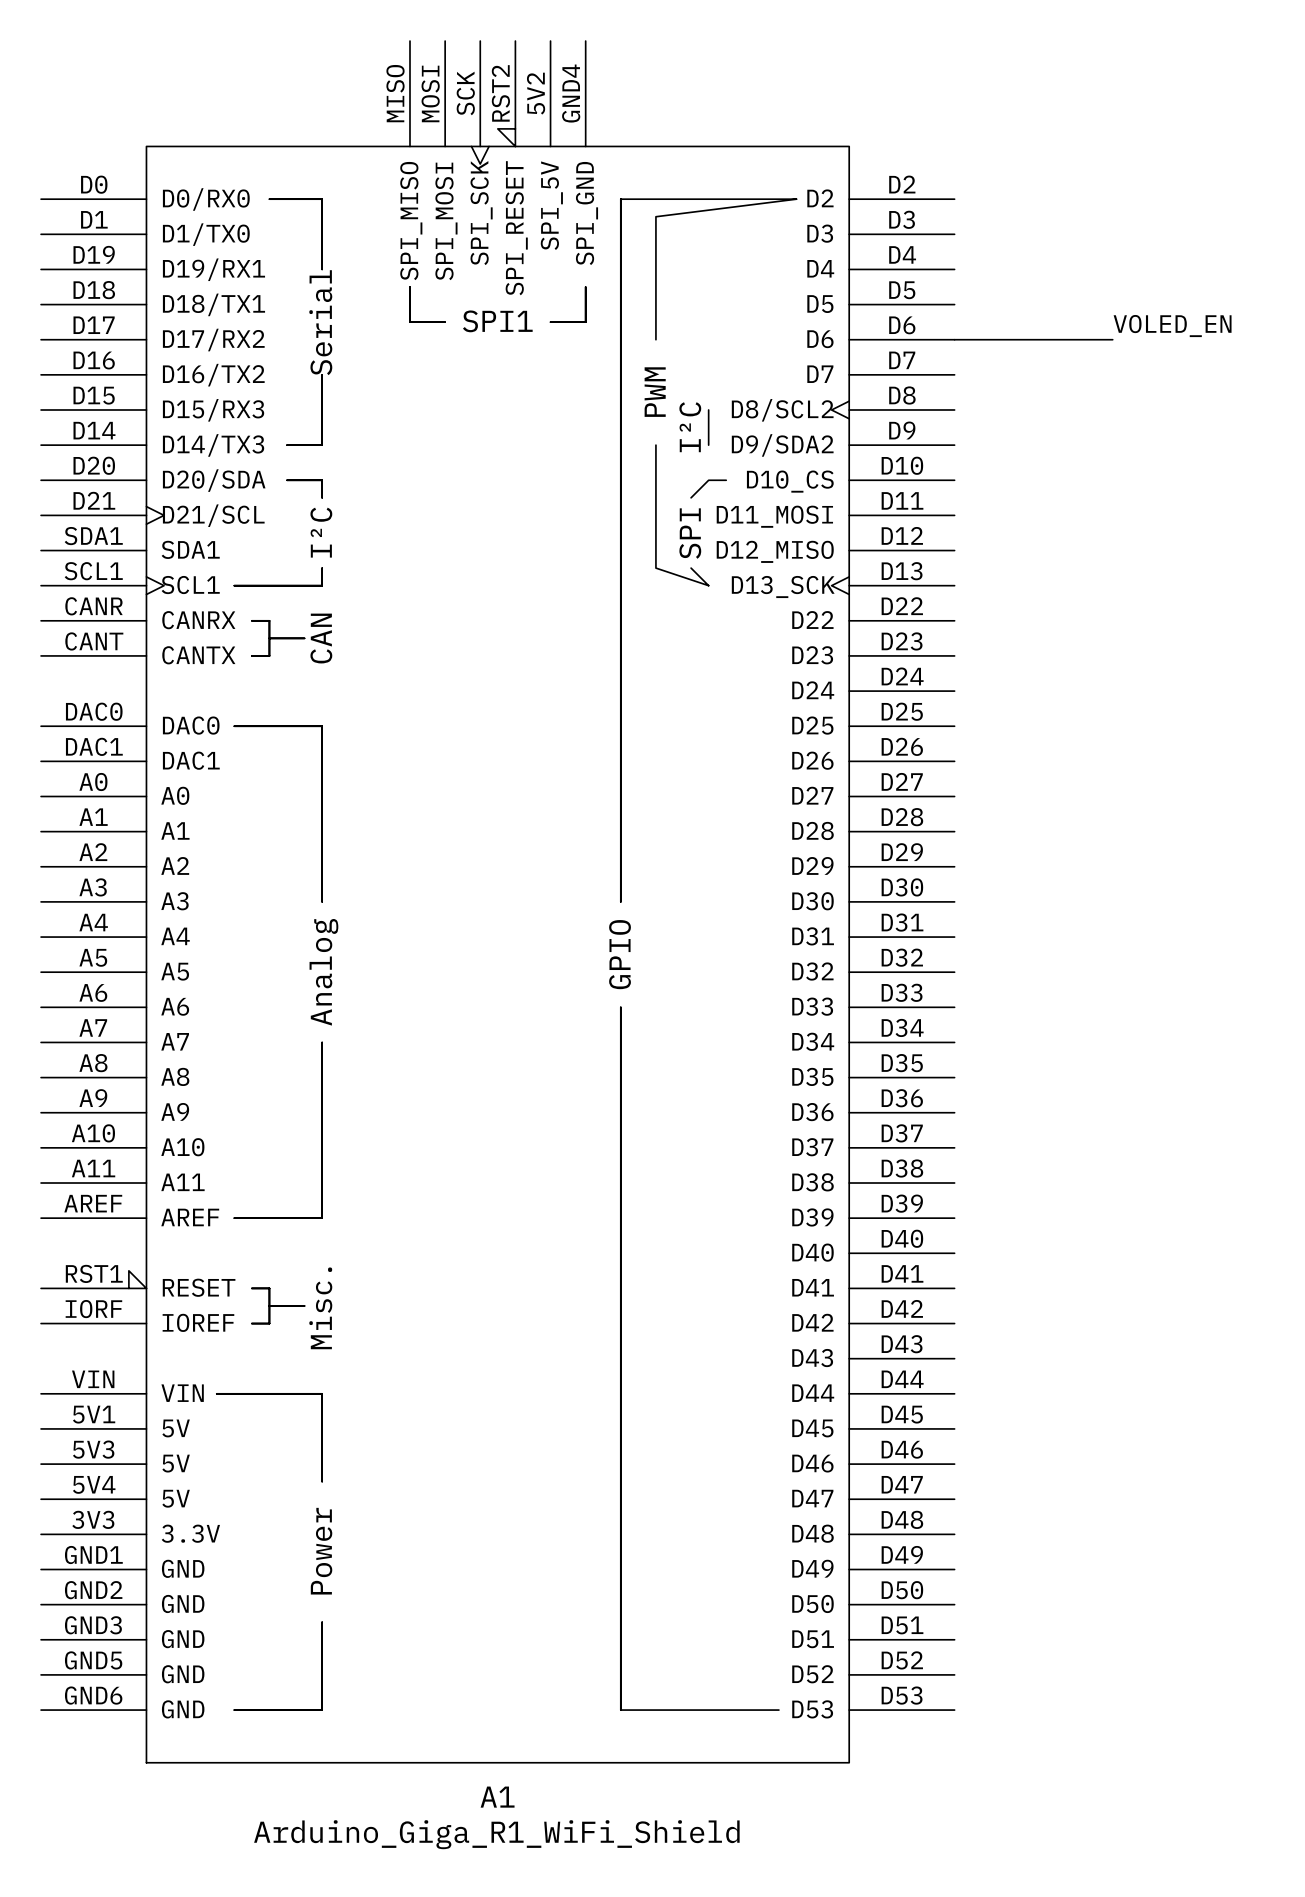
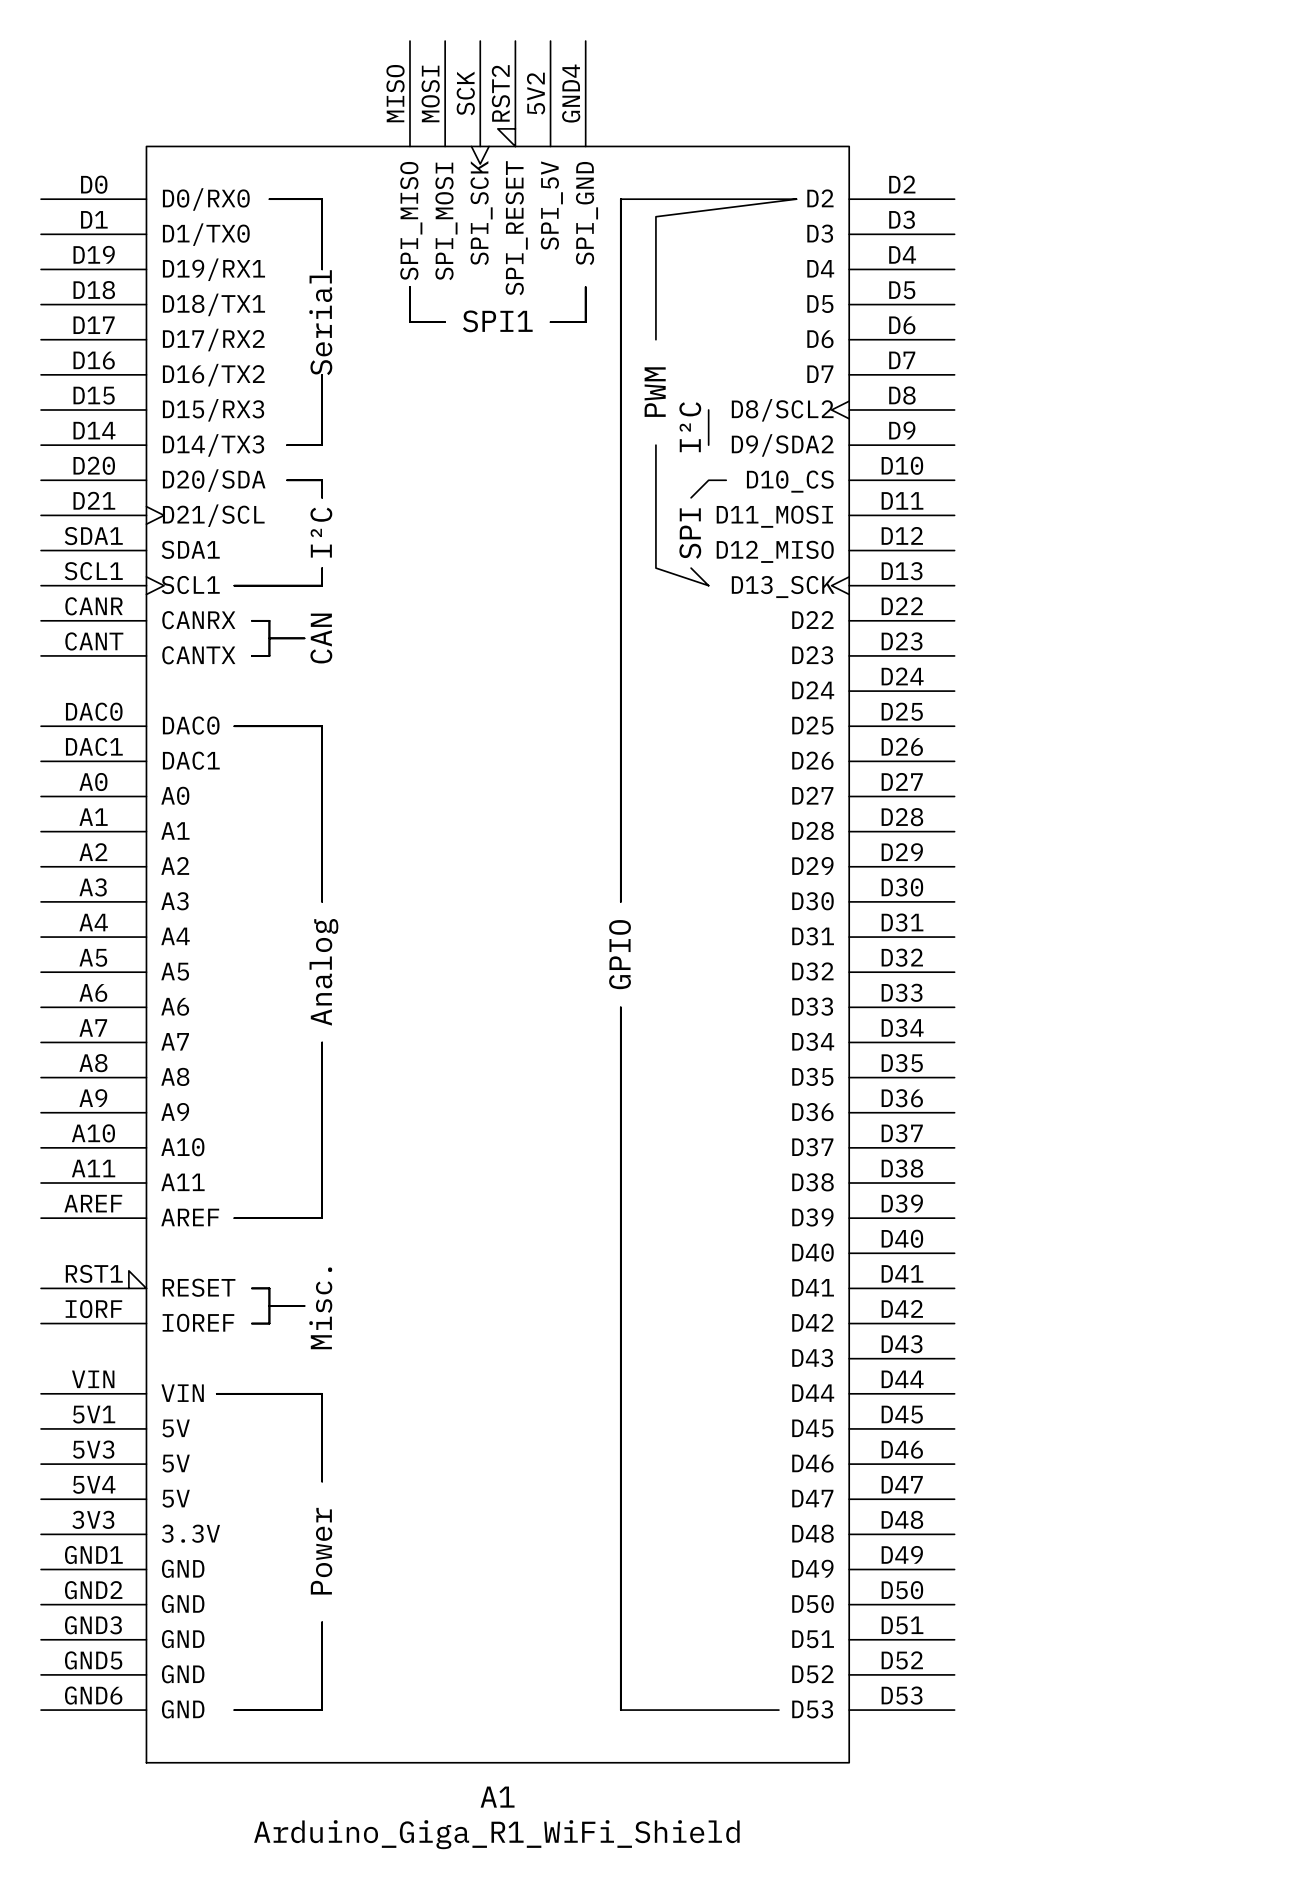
label: VOLED_EN (1172, 326) -> none
wire: (954, 339) (1112, 339) -> none

